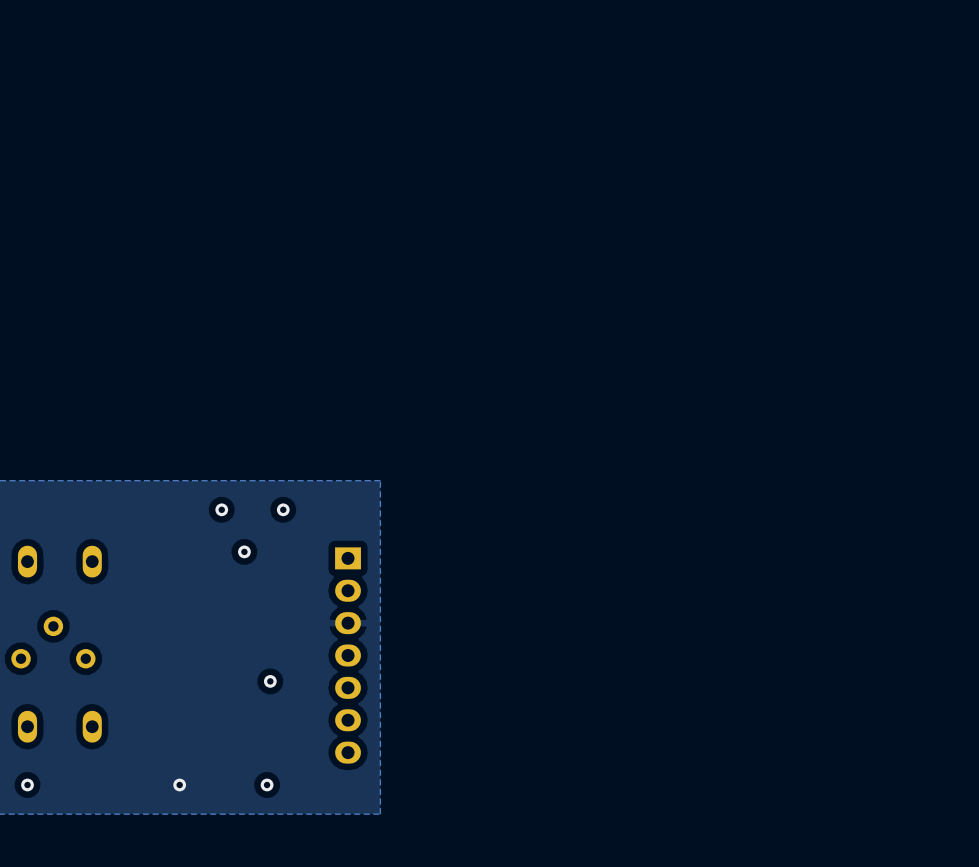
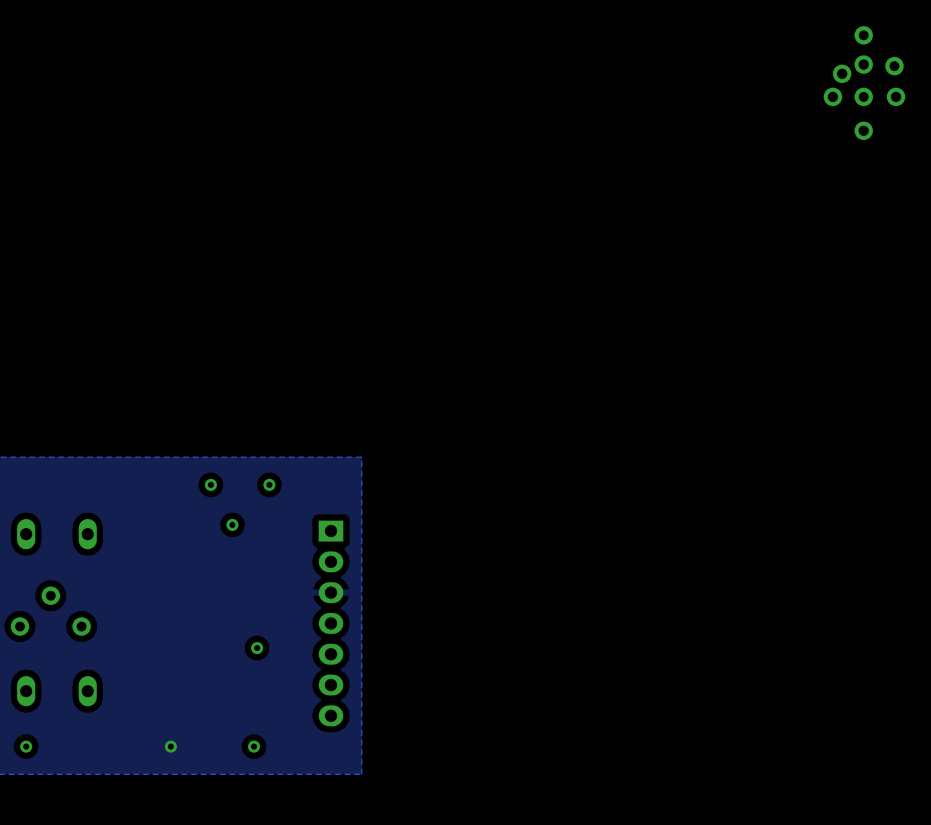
part: none -> (879, 66)
part: none -> (864, 97)

